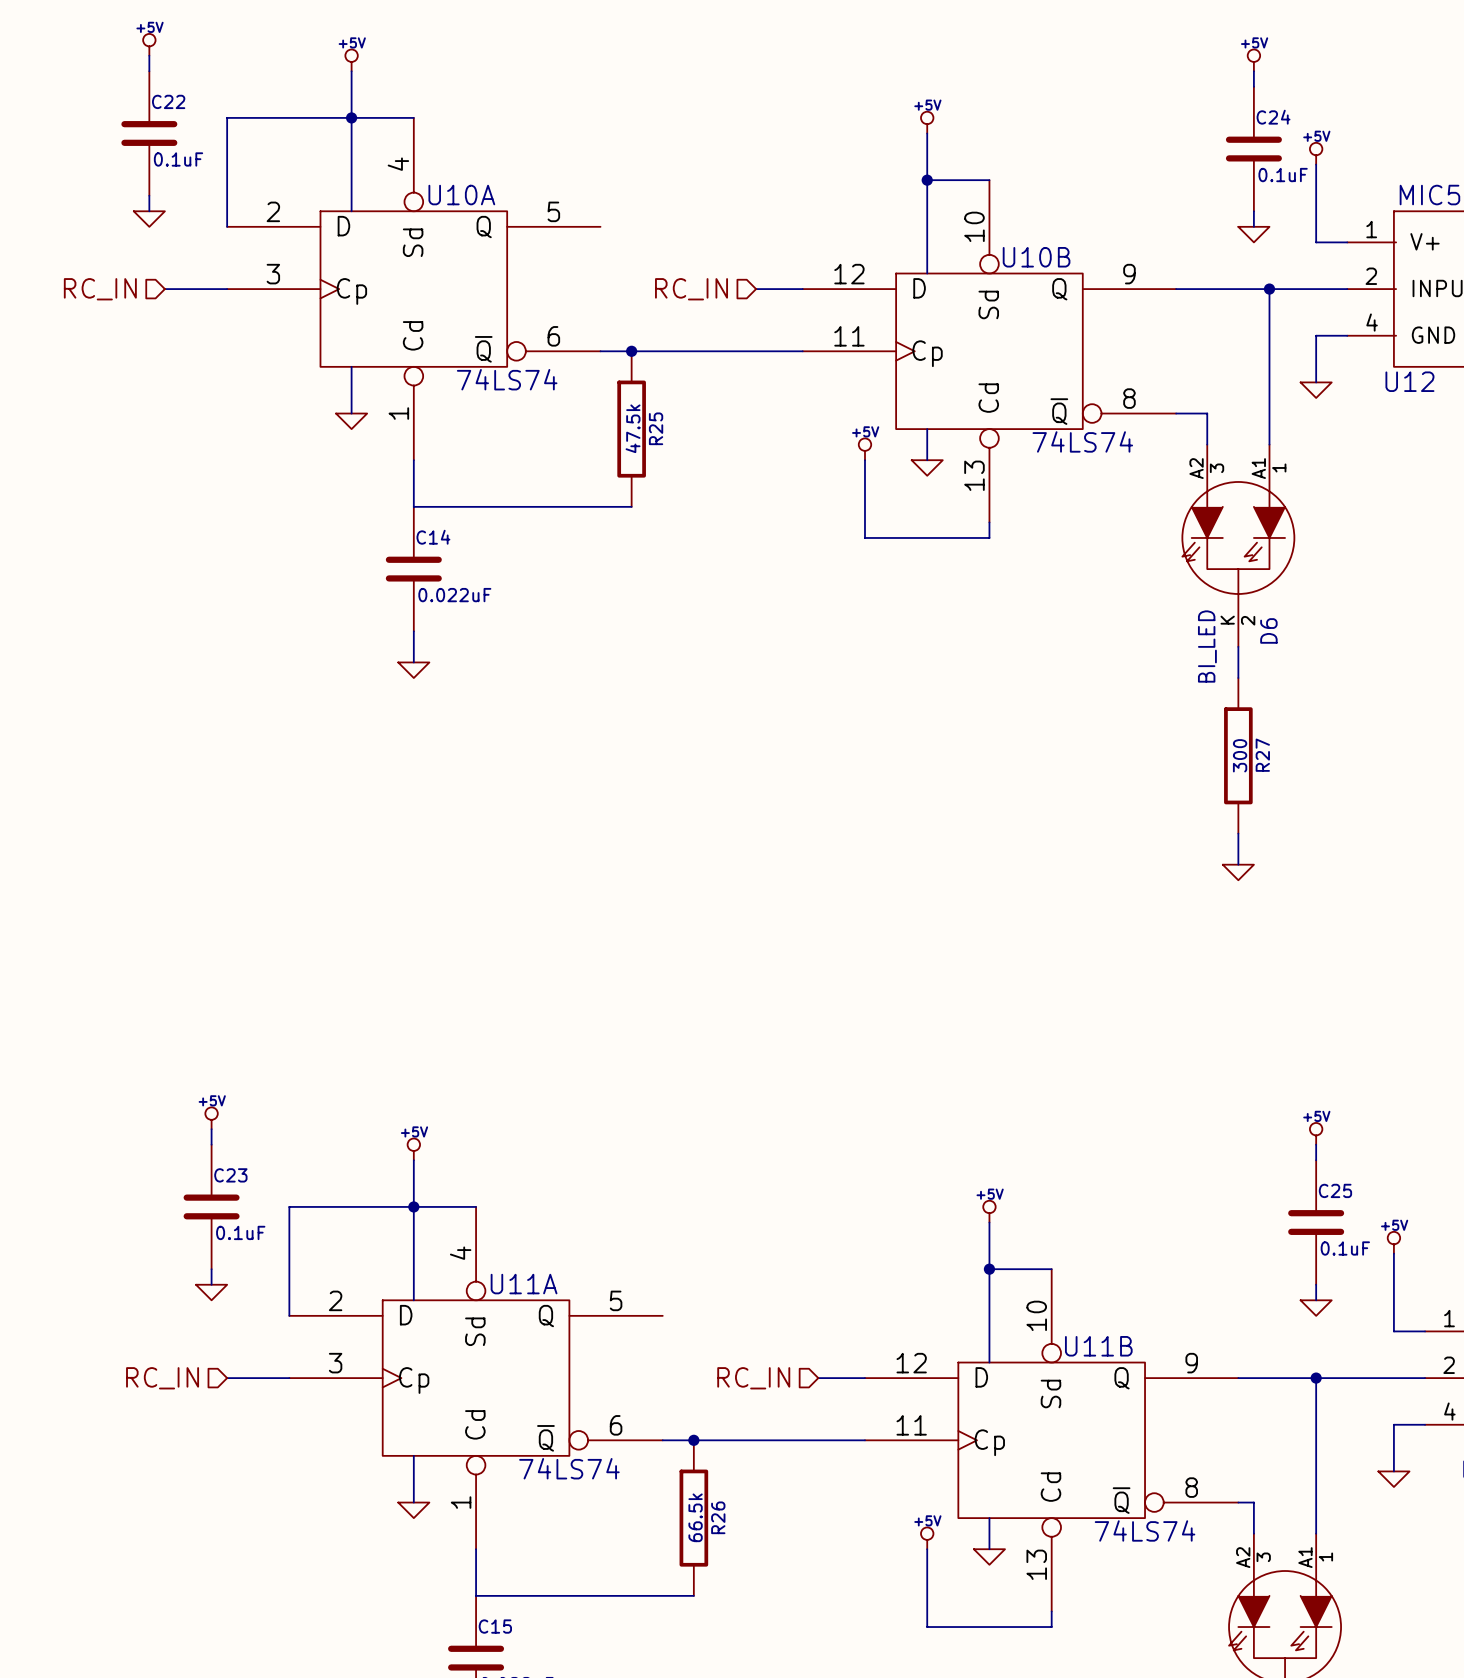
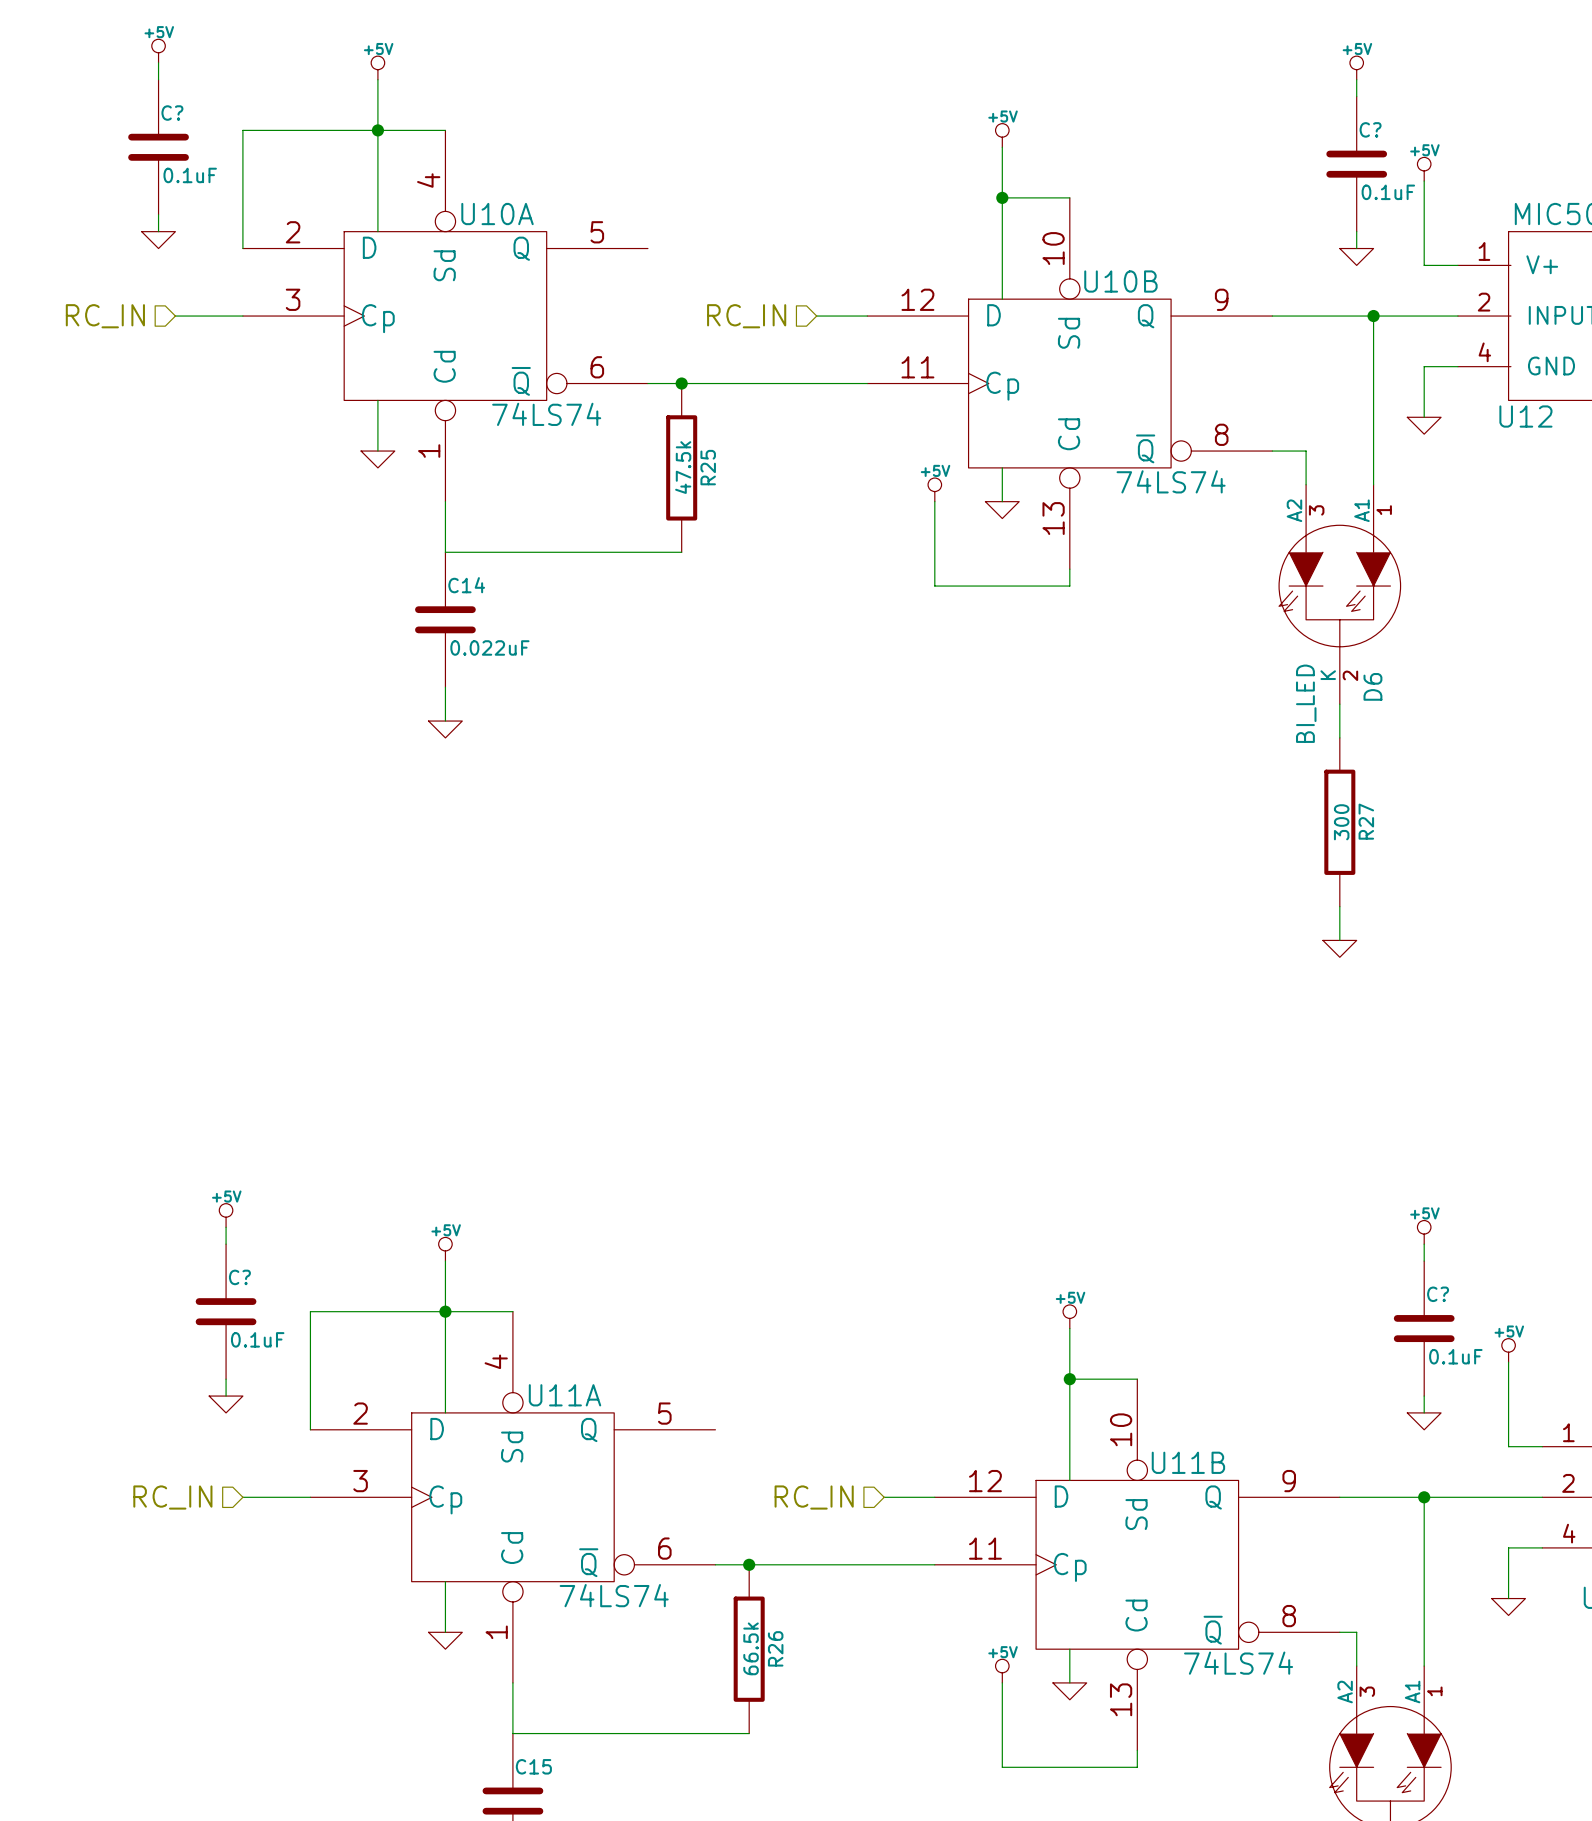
C22 name: C22 (168, 101) -> C? (172, 113)
C24 name: C24 (1273, 117) -> C? (1370, 129)
C23 name: C23 (230, 1175) -> C? (239, 1277)
C25 name: C25 (1335, 1190) -> C? (1438, 1294)

